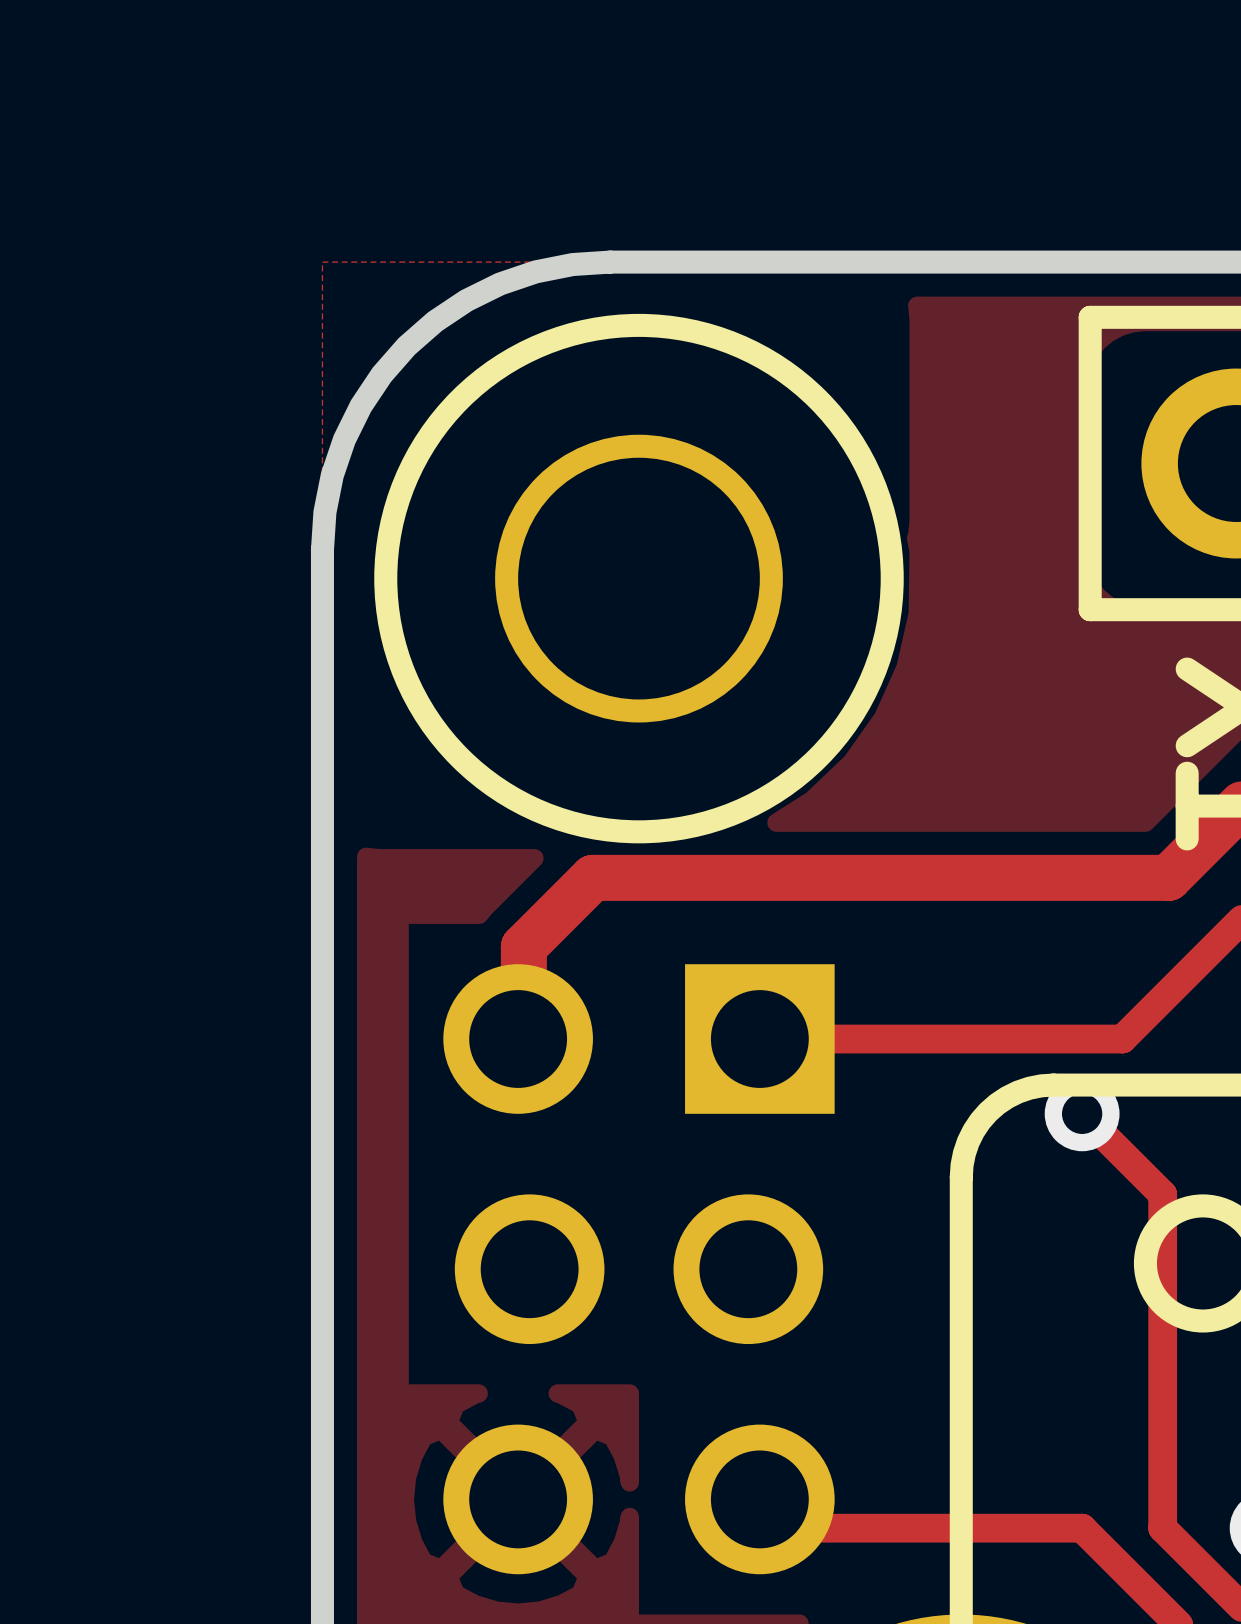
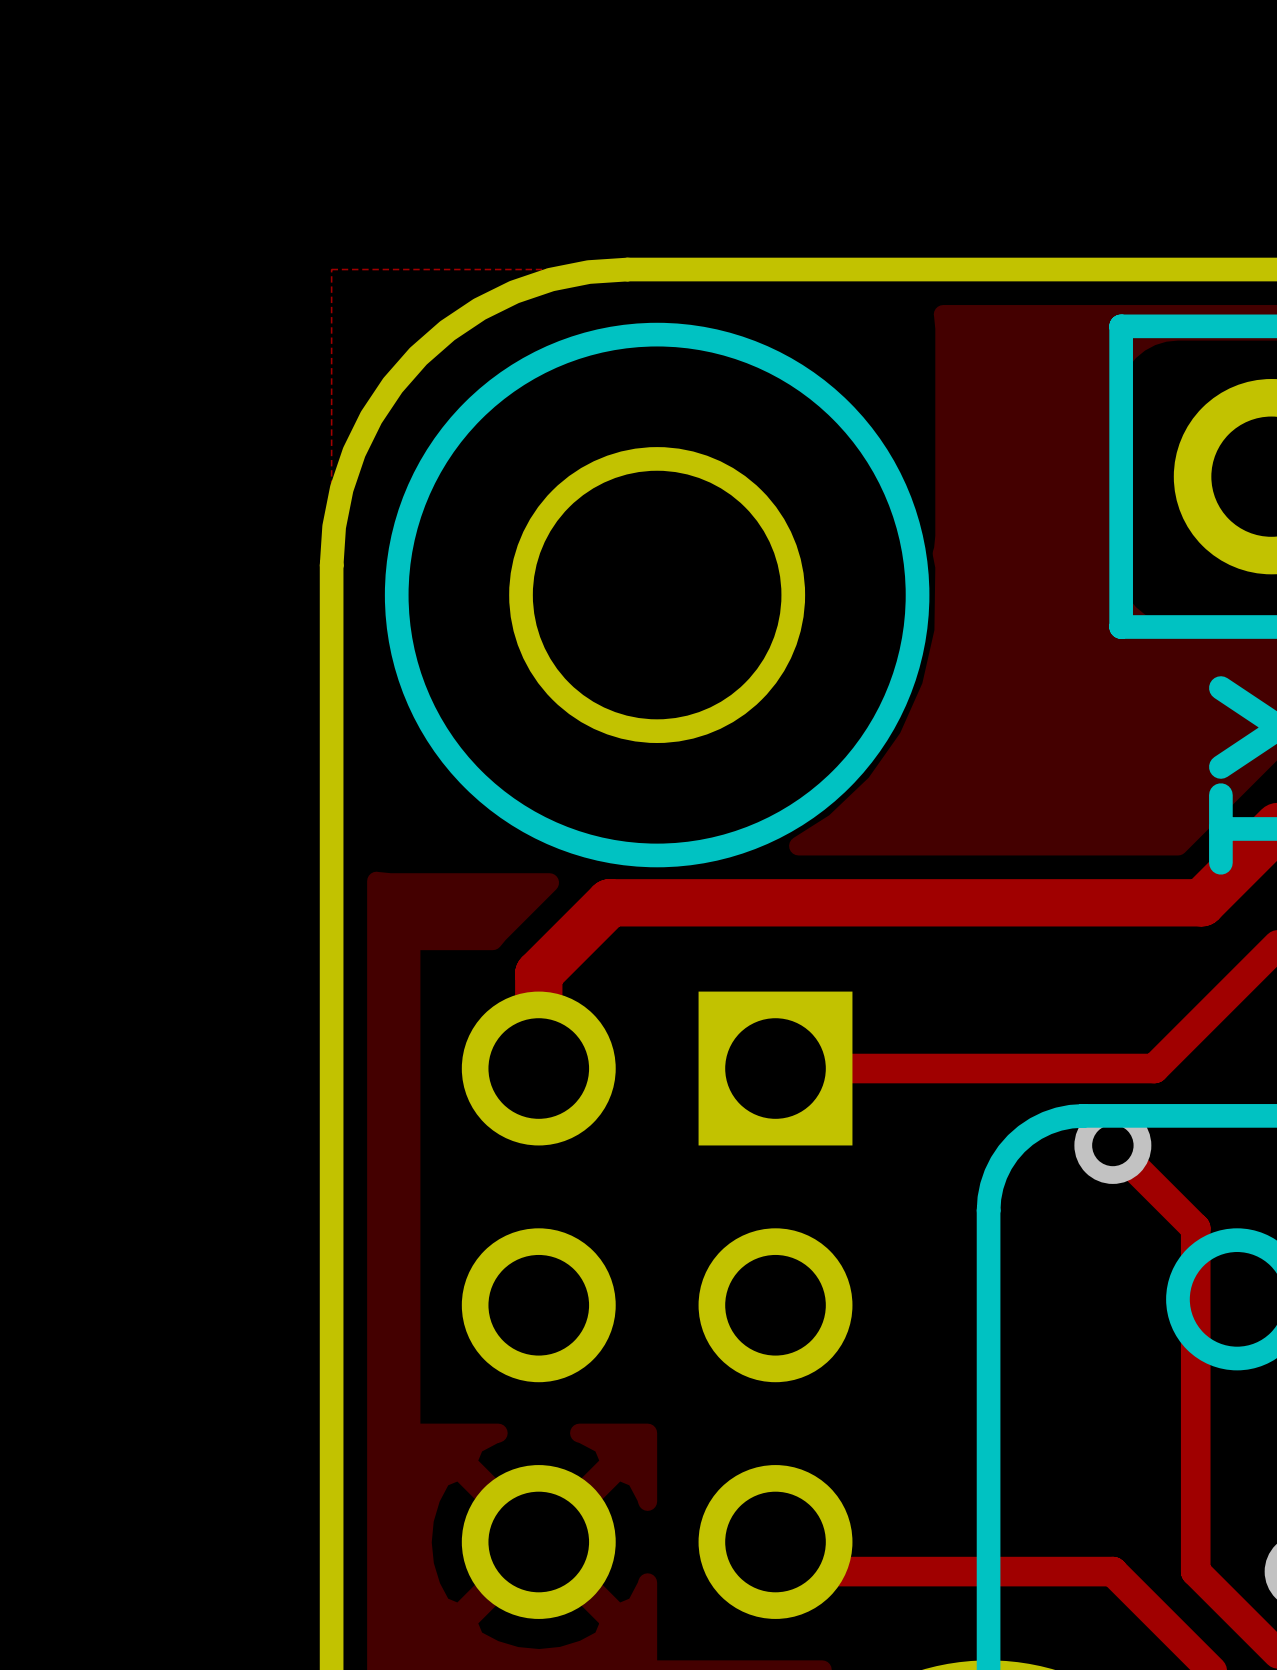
part footprint: [443, 964, 835, 1575] -> [461, 991, 853, 1619]

